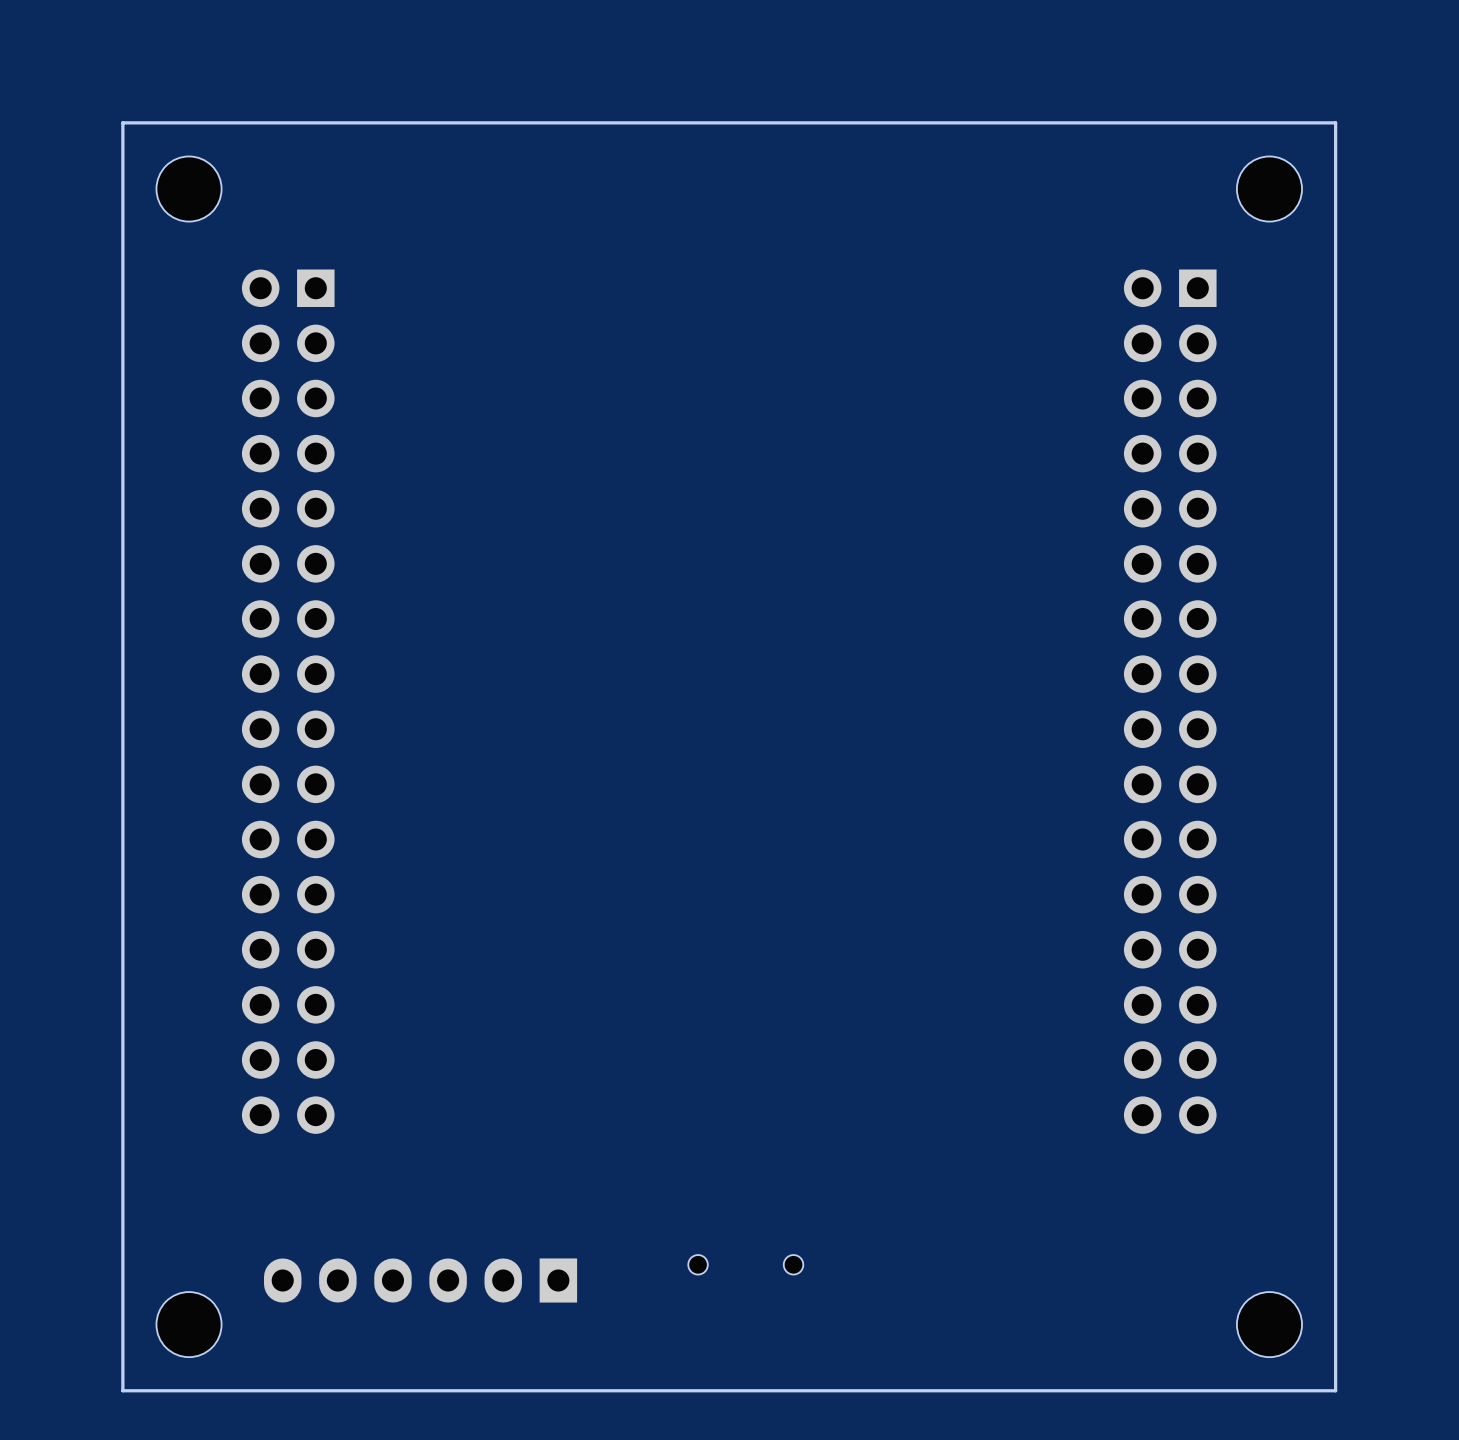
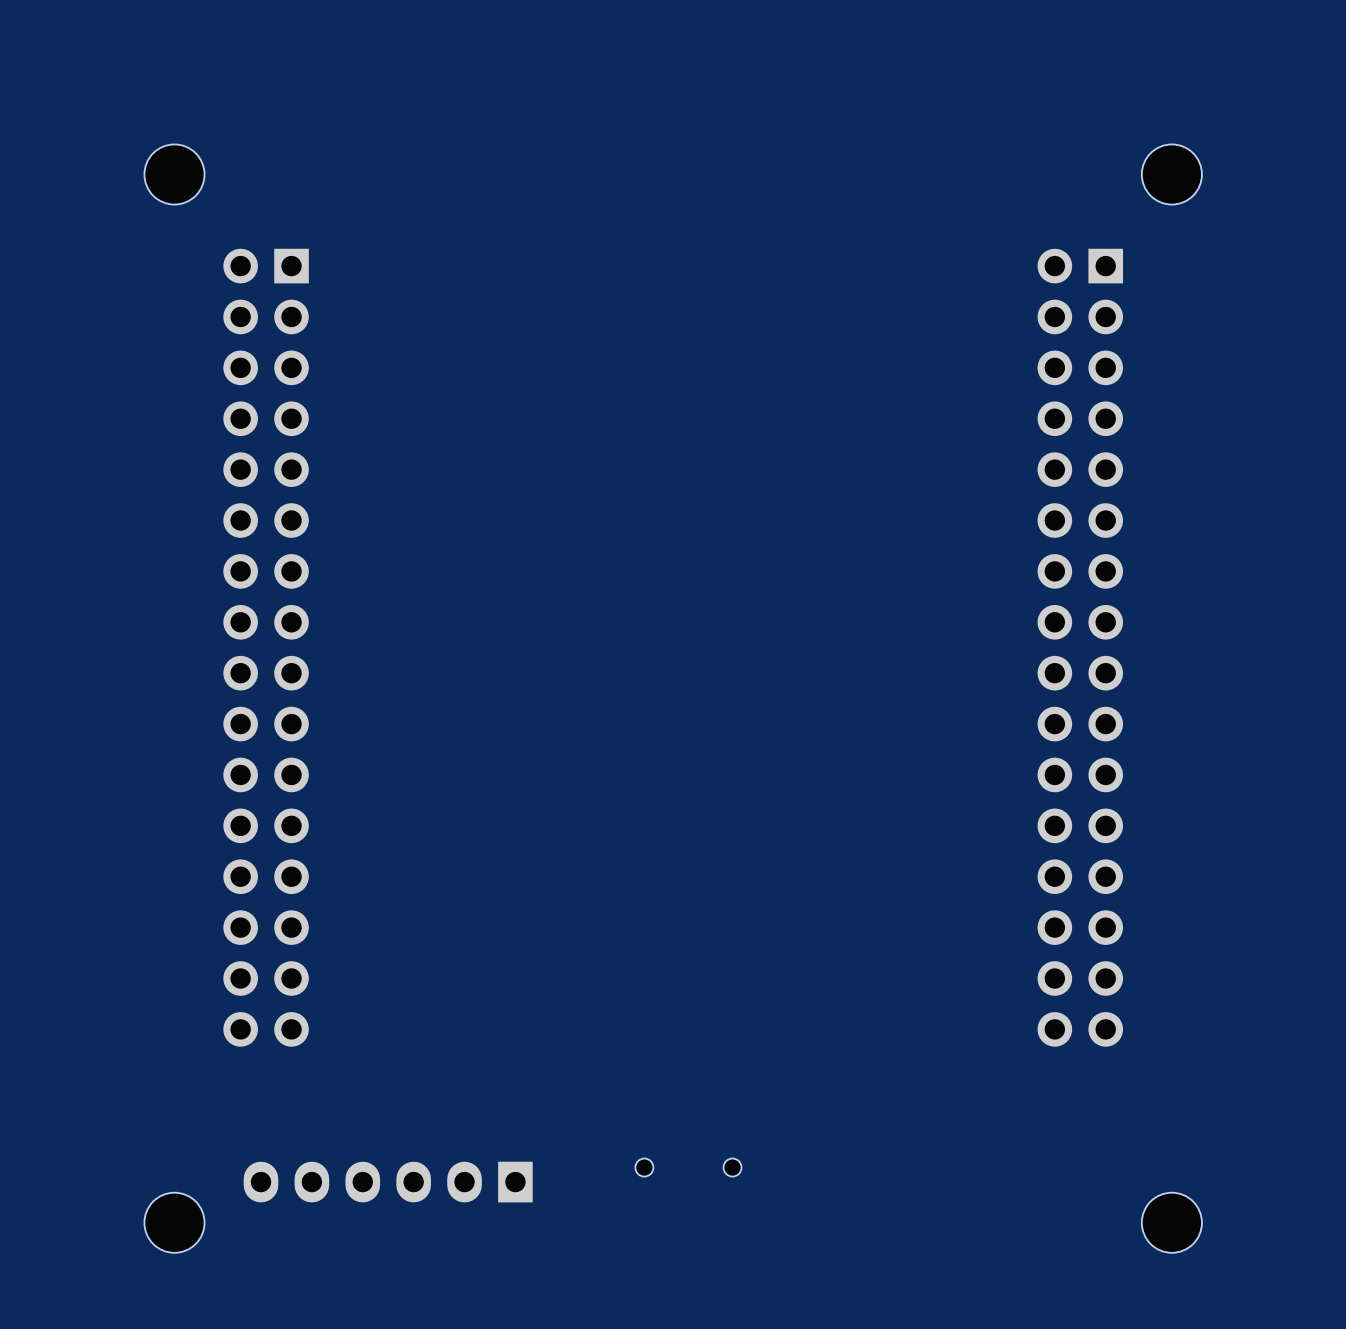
board edge: (1335, 122) (122, 122) (122, 1390) (1335, 1390) (1335, 122) -> none

